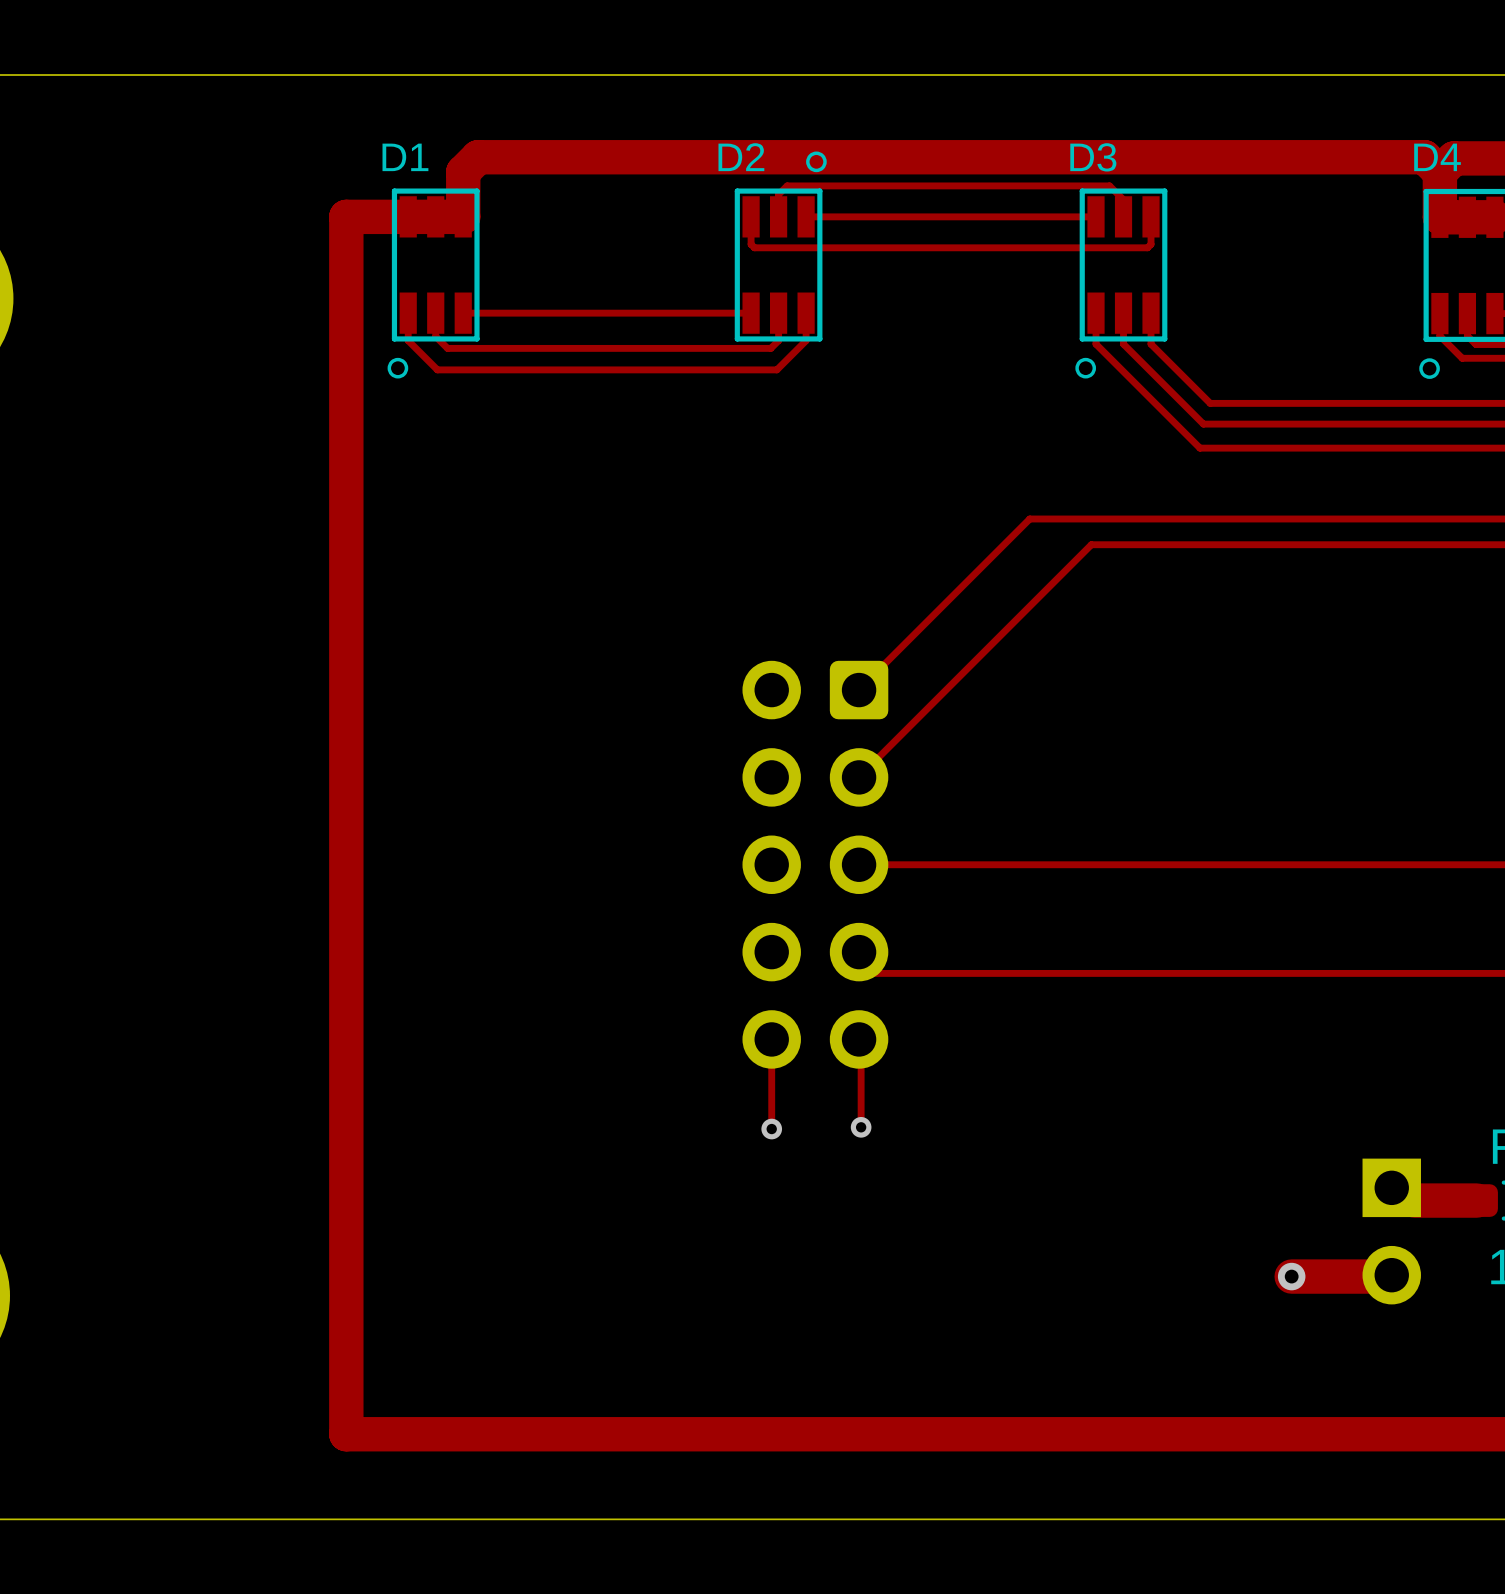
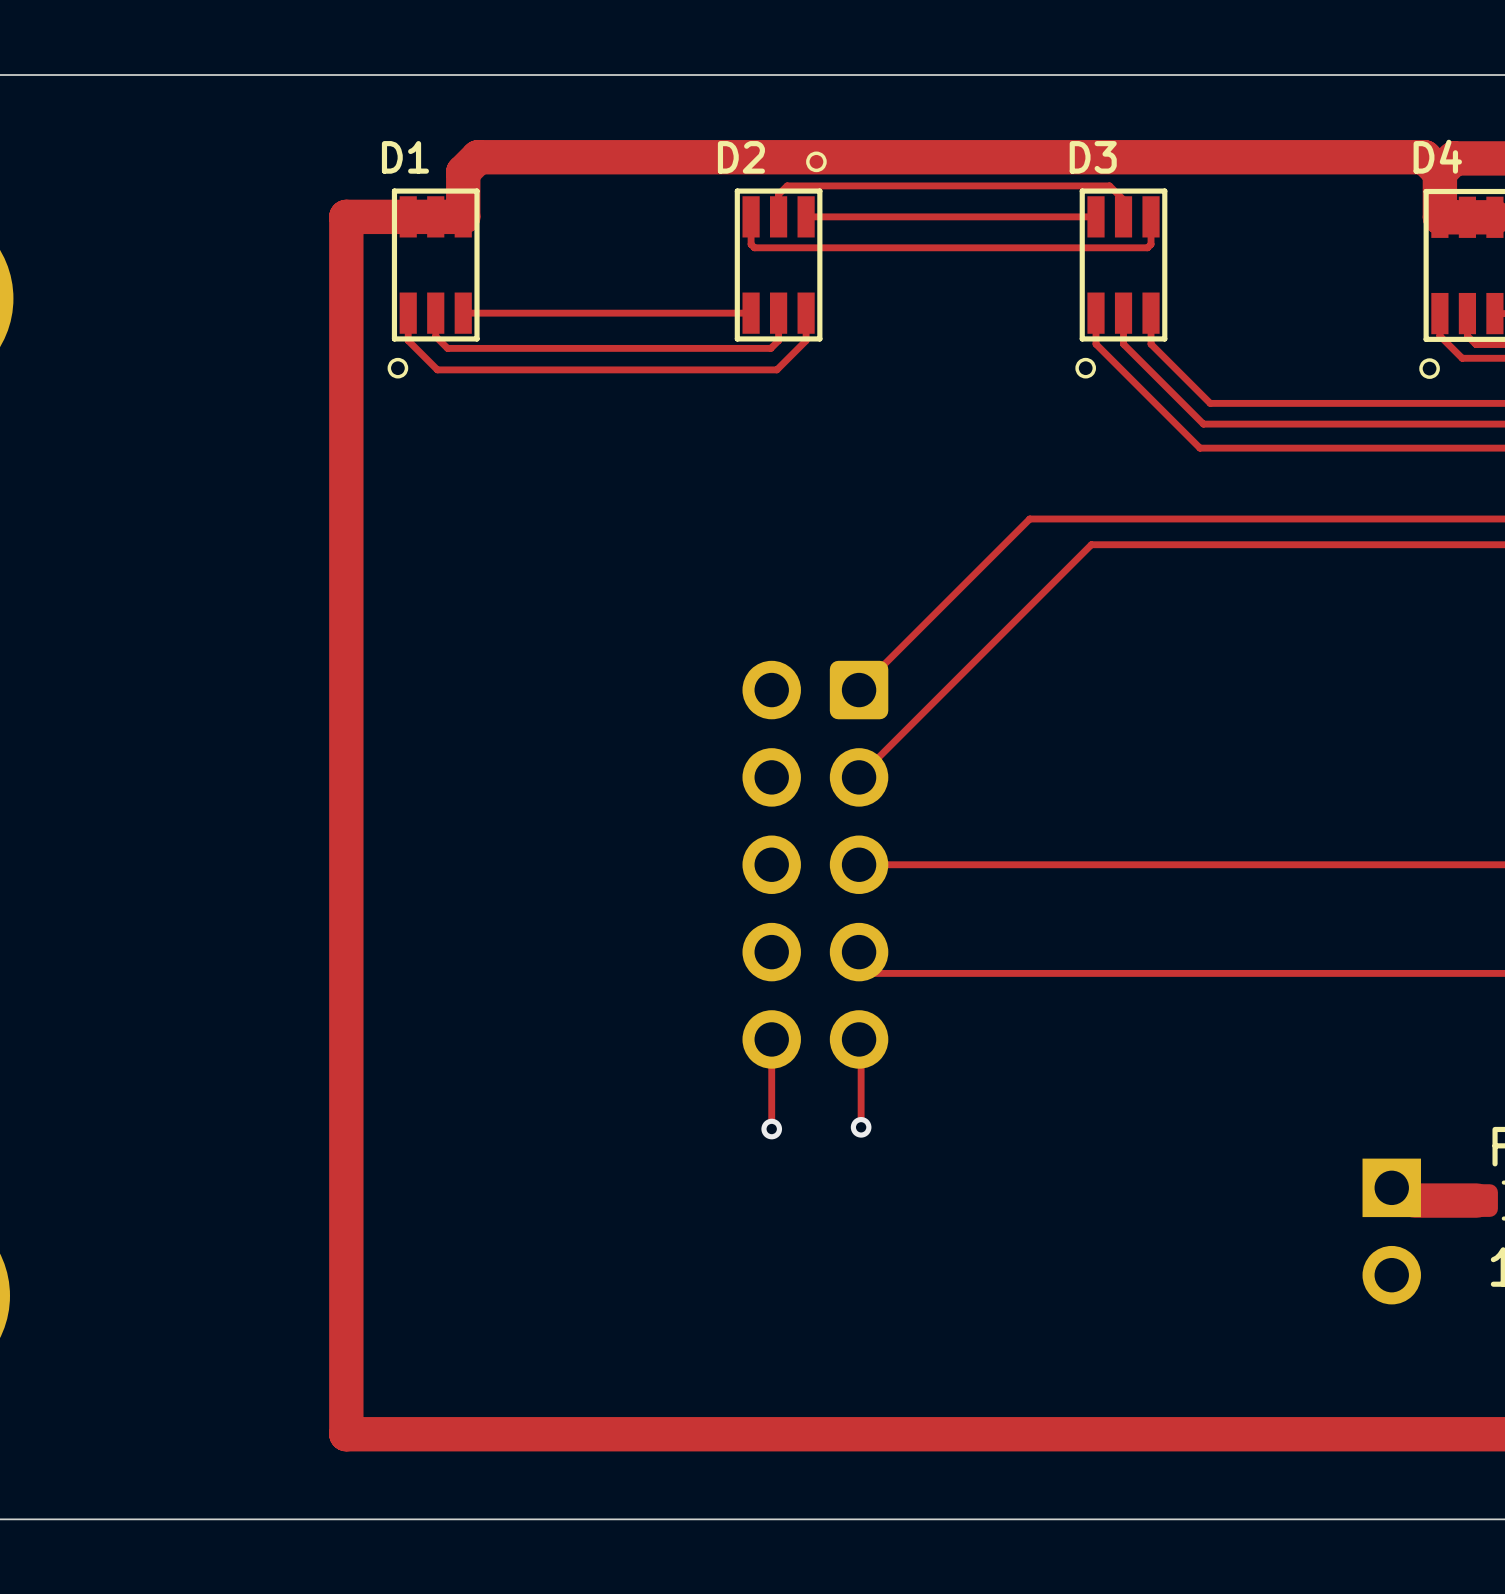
track: (1291, 1276) (1384, 1276) -> none
via: (1291, 1276) -> none

